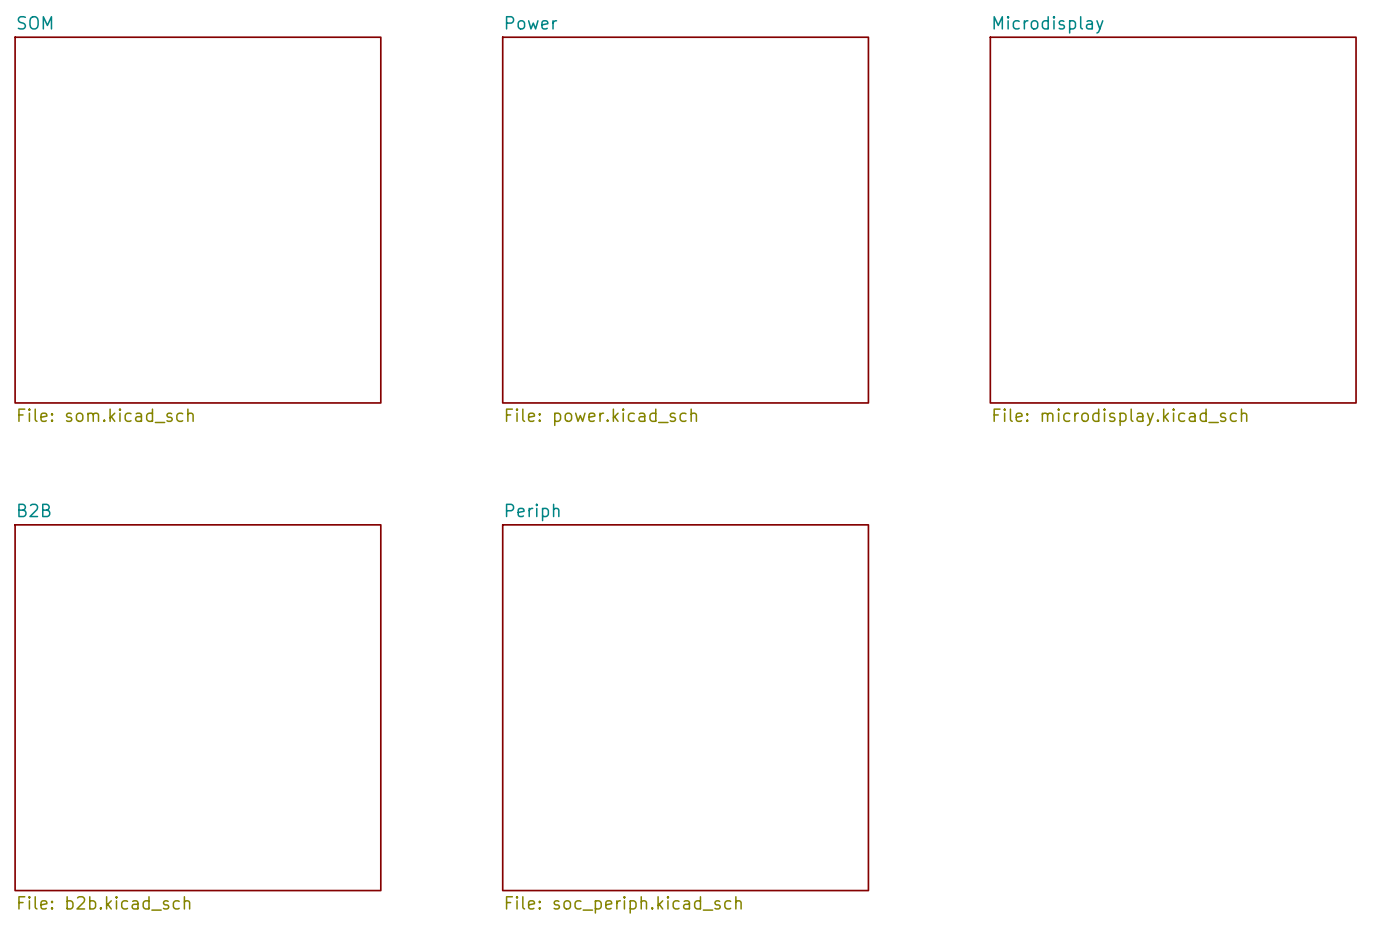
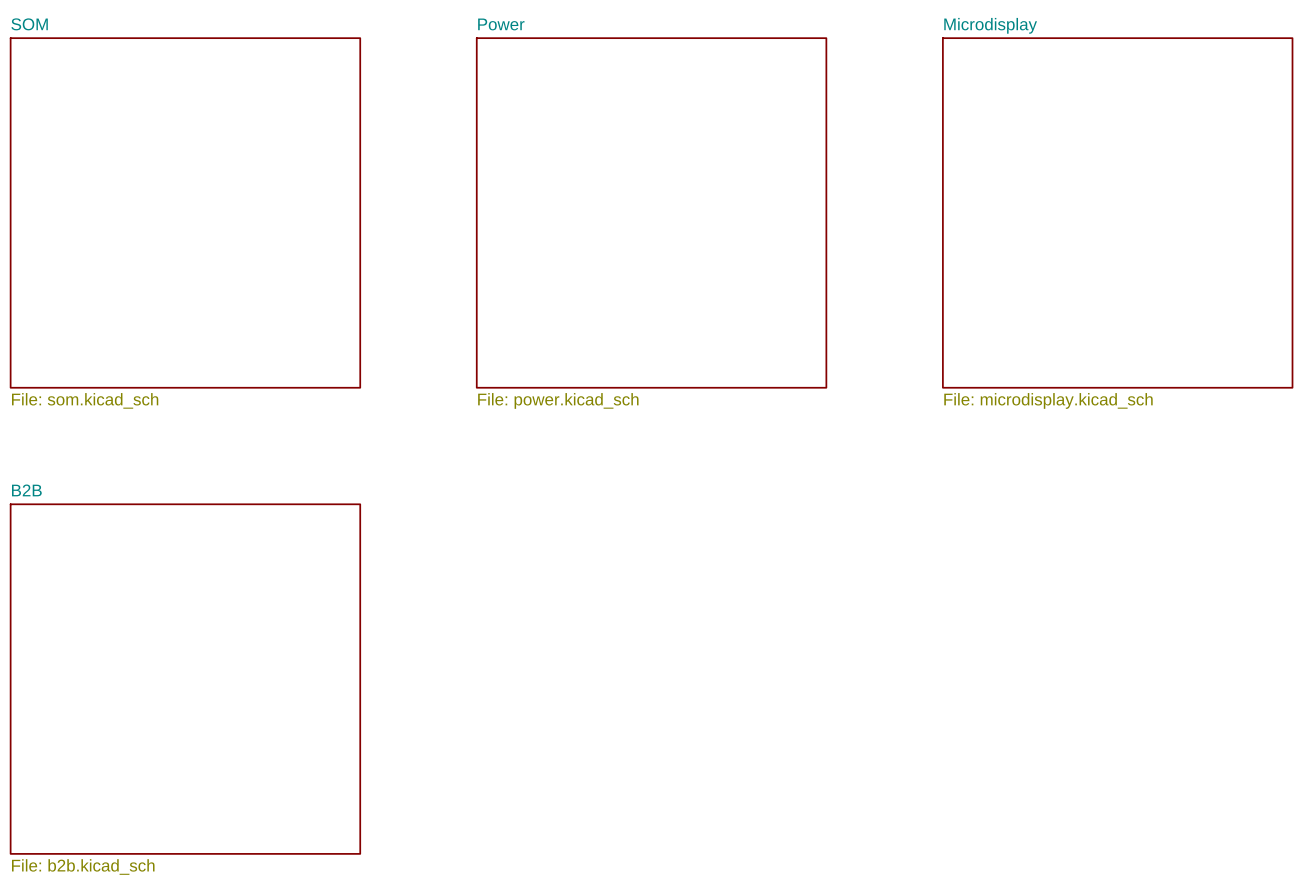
sheet Periph: File: soc_periph.kicad_sch (685, 707) -> none

